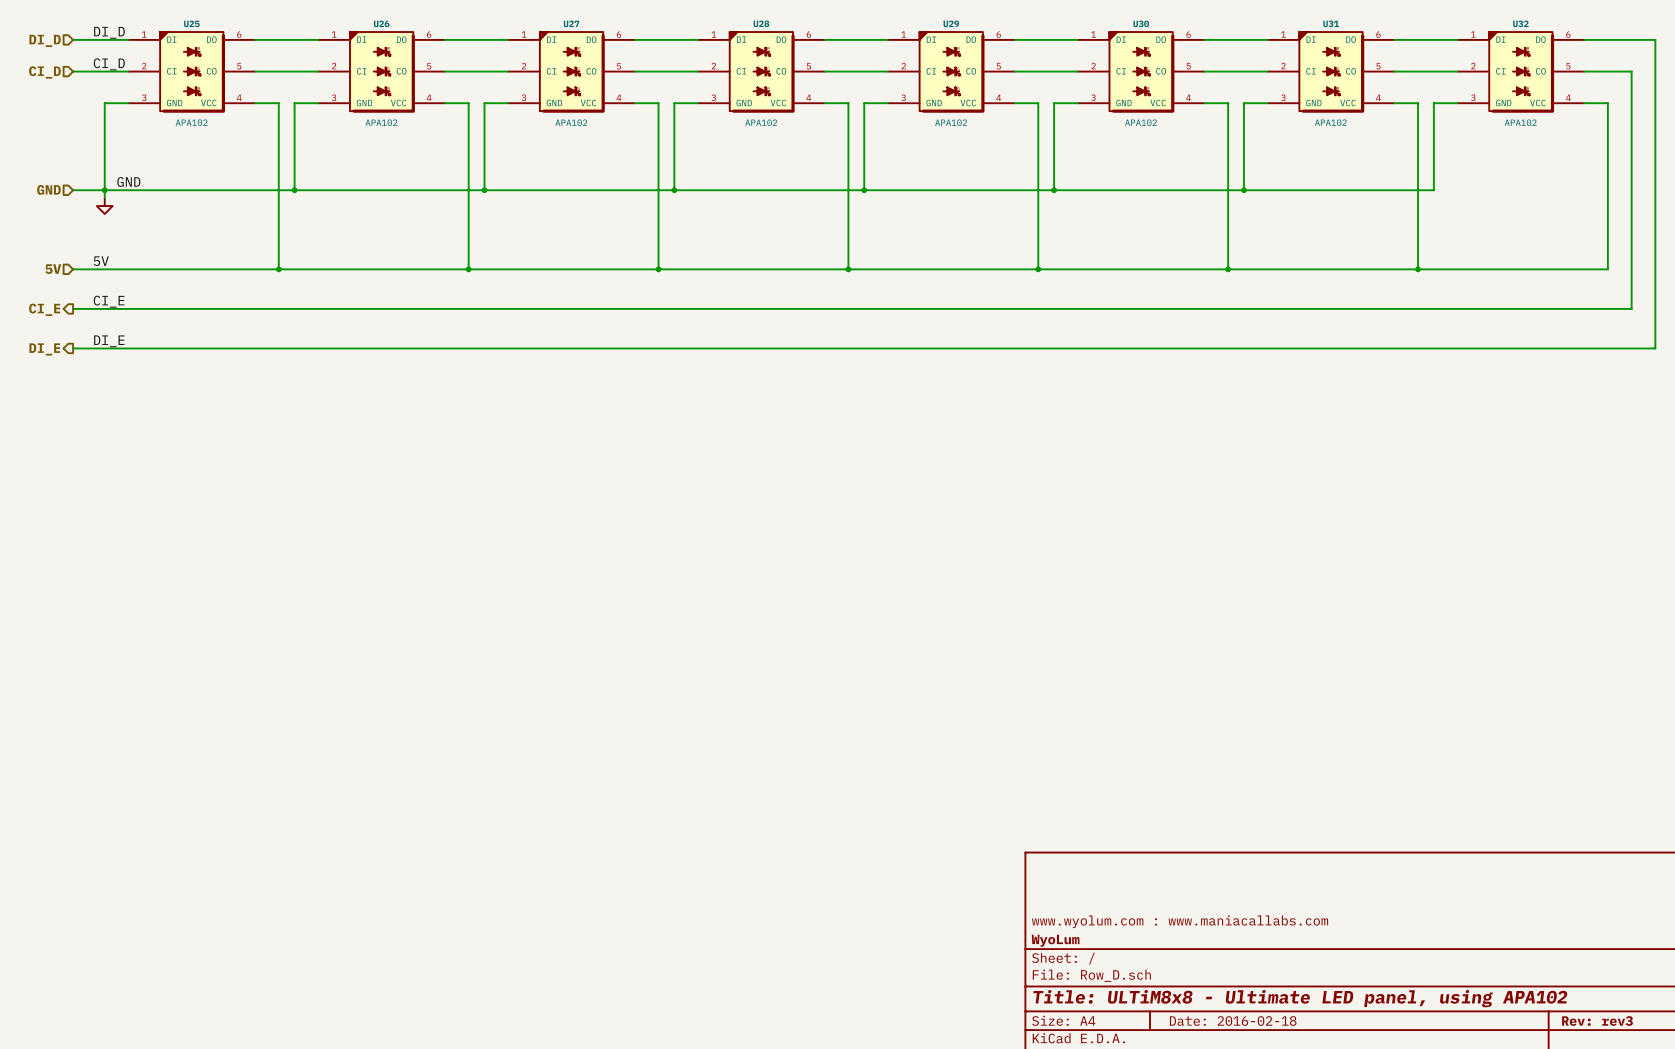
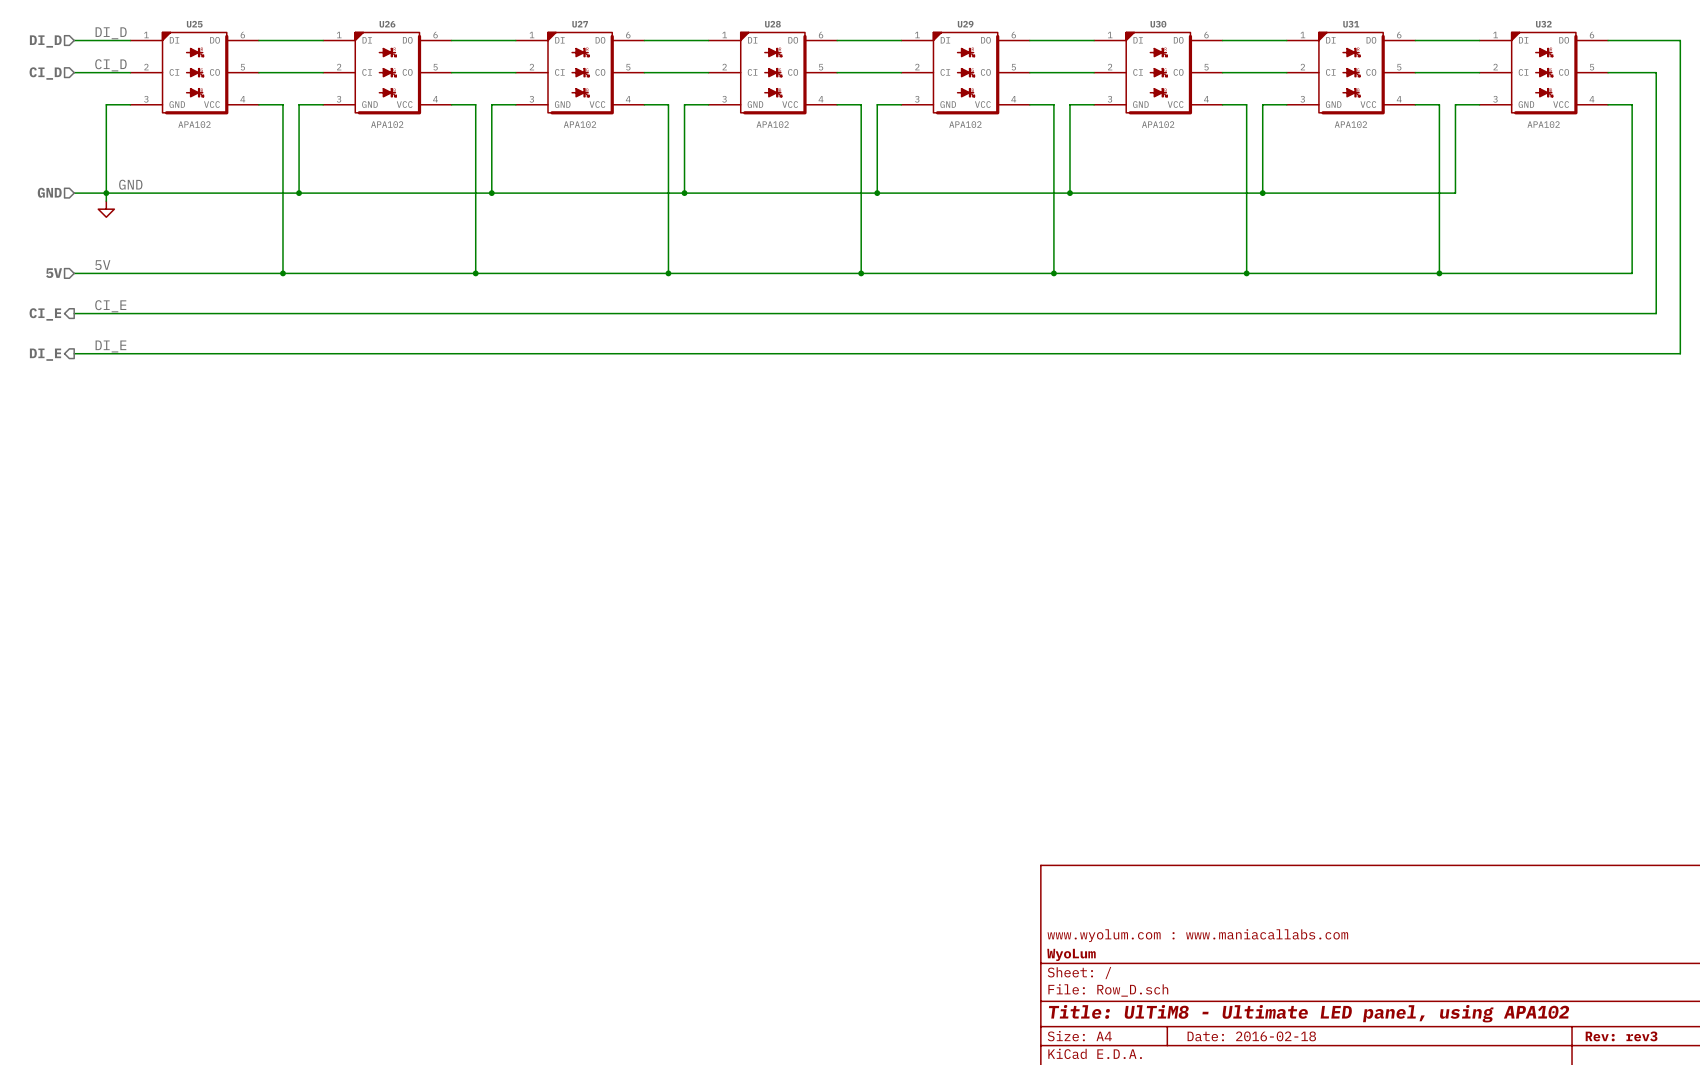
title block: Title: ULTiM8x8 - Ultimate LED panel, using APA102 (1300, 998) -> Title: UlTiM8 - Ultimate LED panel, using APA102 (1309, 1013)

